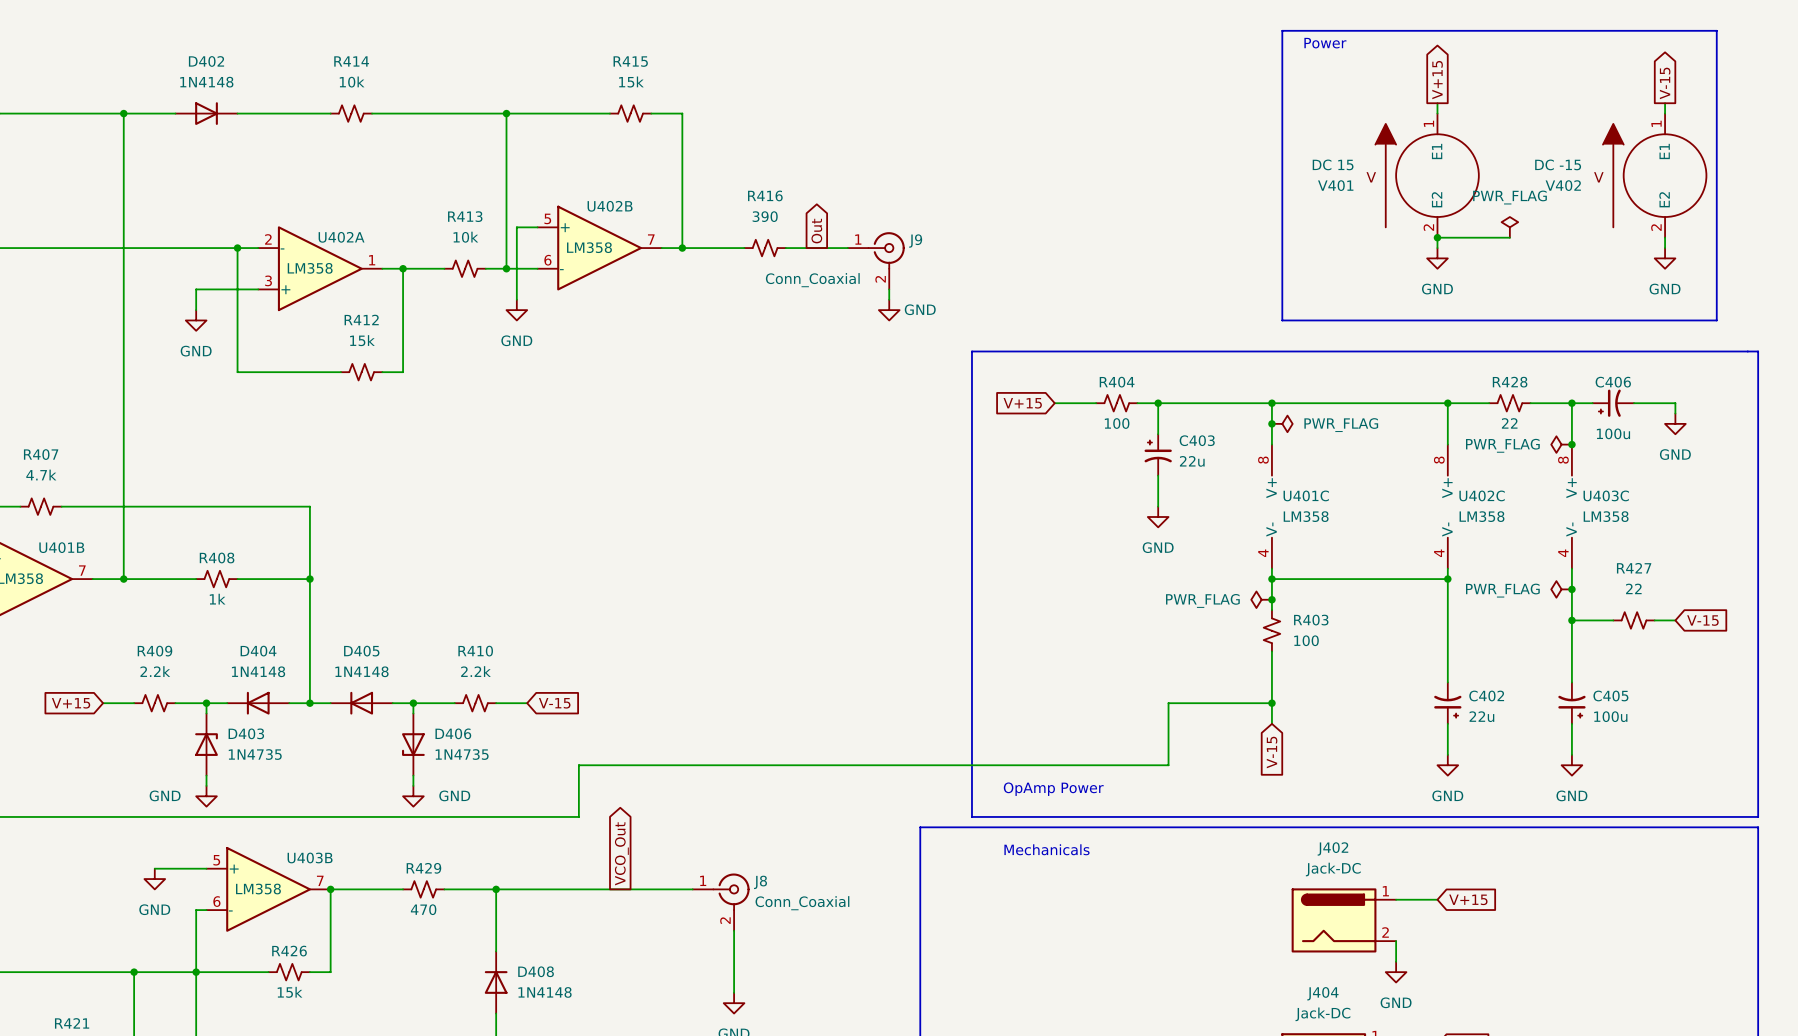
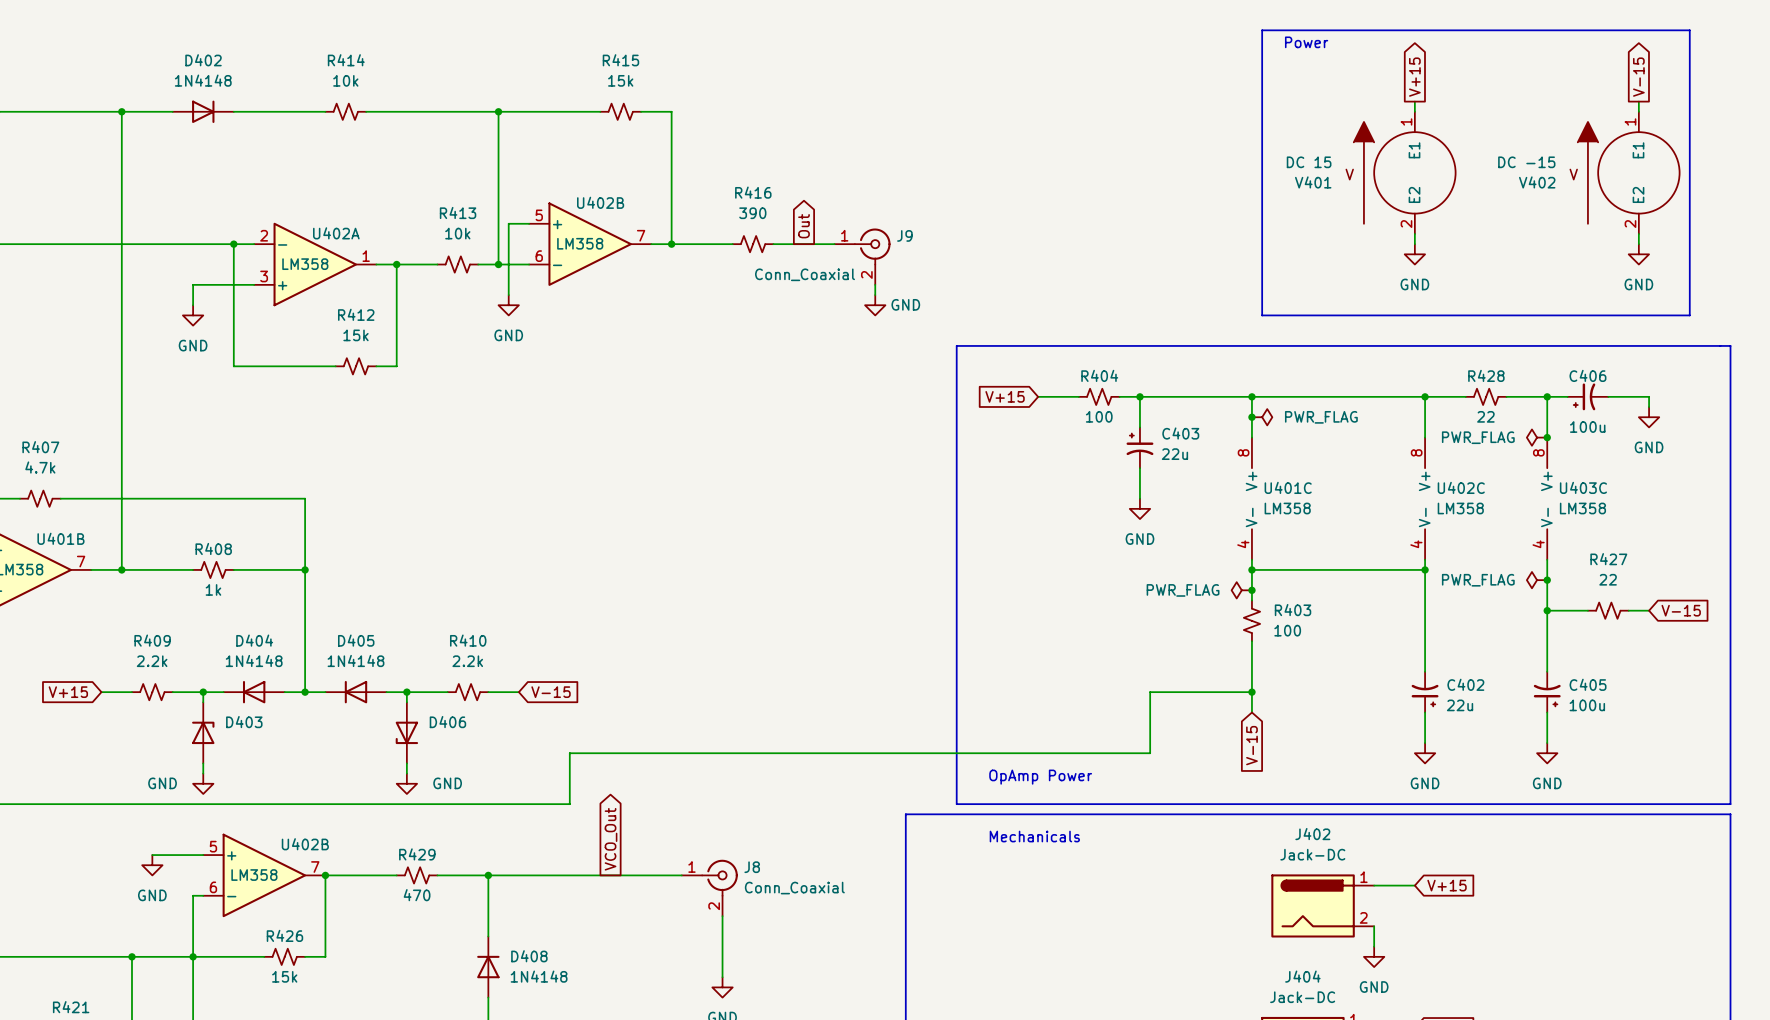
power symbol: PWR_FLAG (1509, 227) -> none
wire: (1437, 237) (1509, 237) -> none
junction: (1437, 237) -> none
D403 value: 1N4735 (255, 754) -> none
D406 value: 1N4735 (462, 754) -> none
U403B name: U403B (310, 857) -> U402B (305, 844)

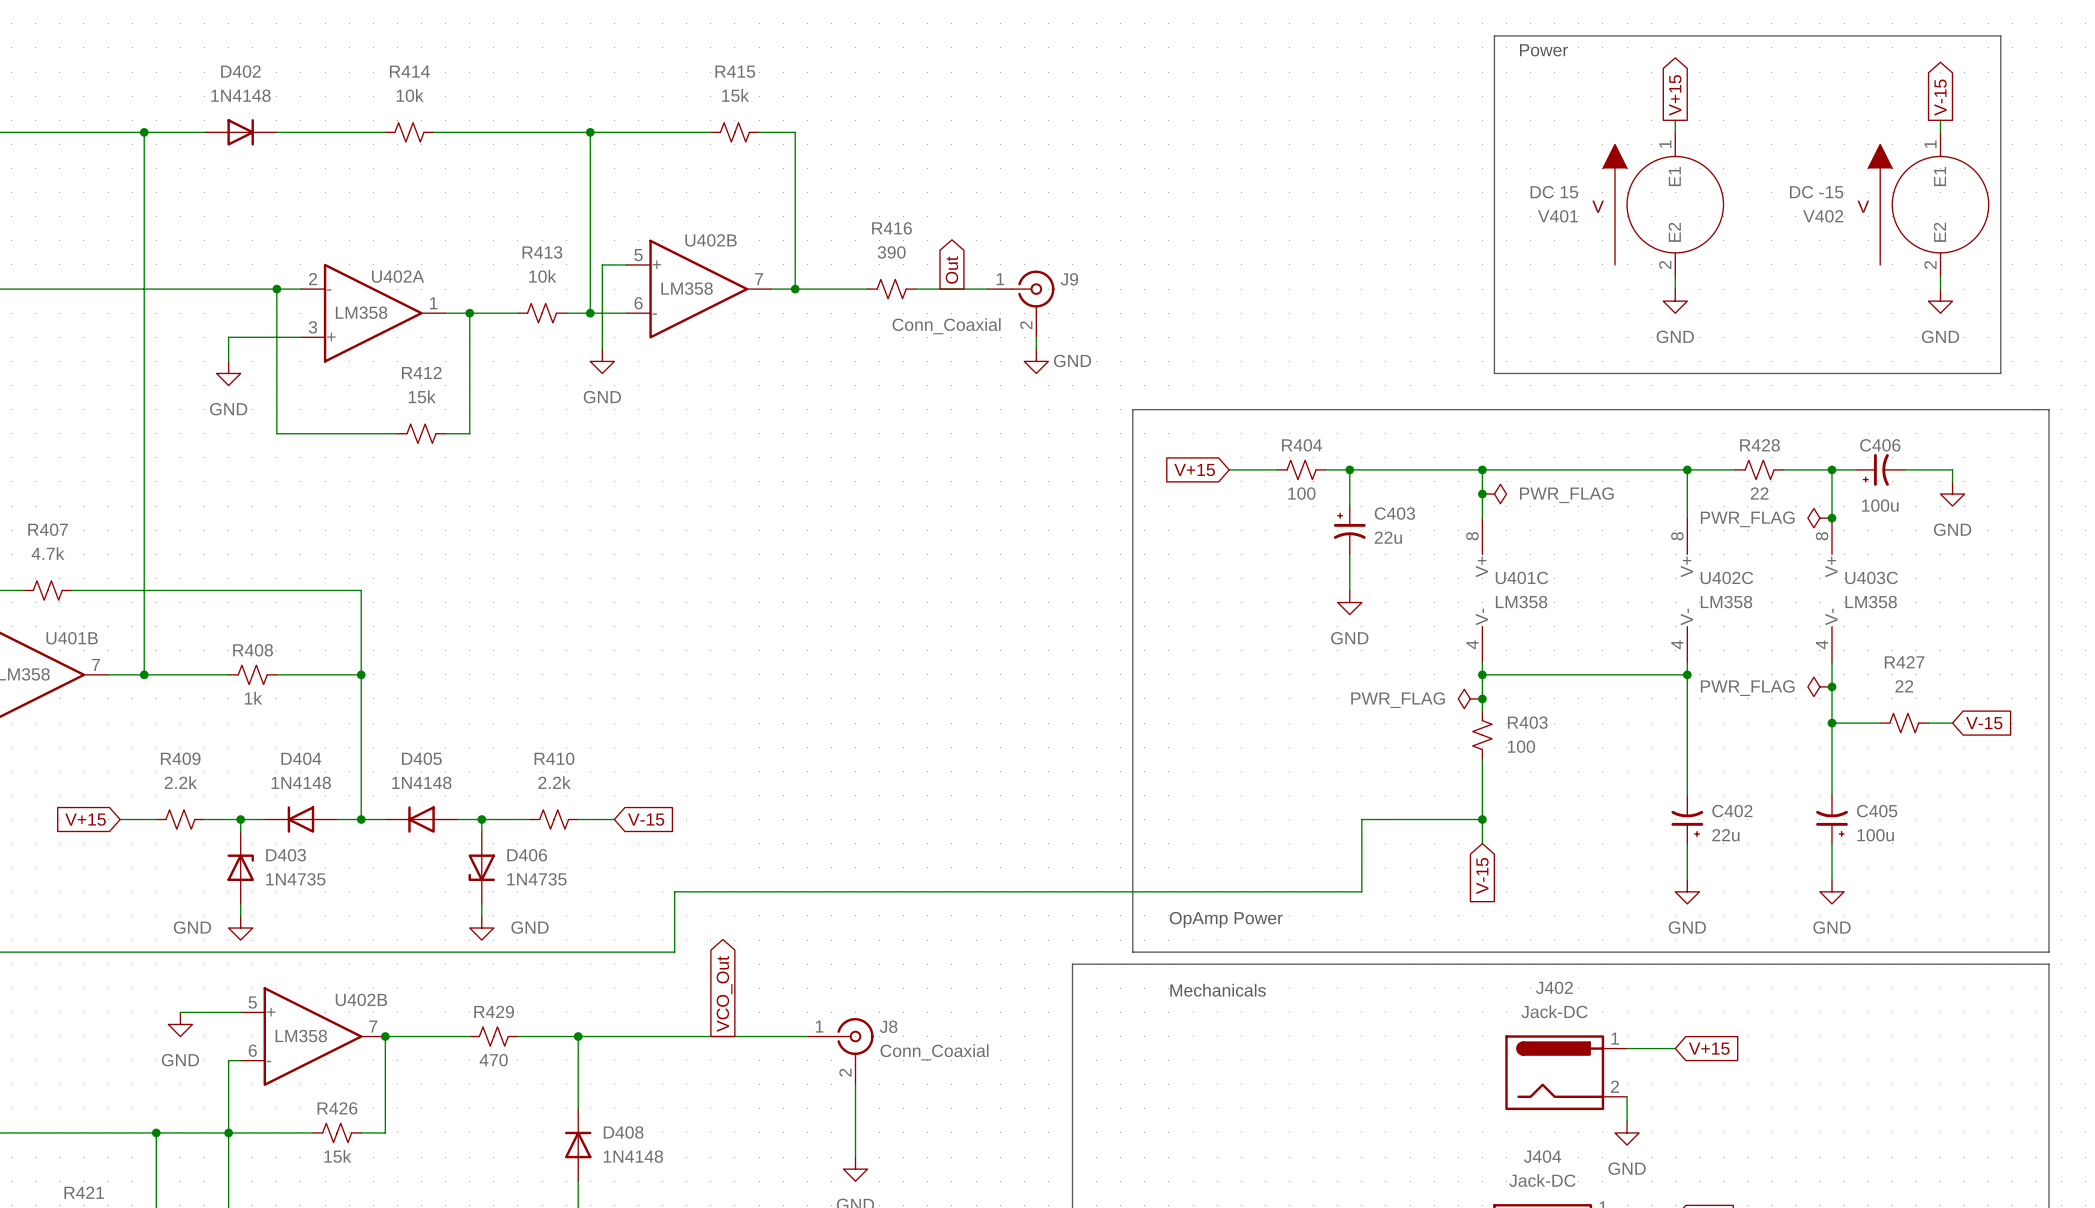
D403 value: none -> 1N4735 (295, 879)
D406 value: none -> 1N4735 (536, 879)

